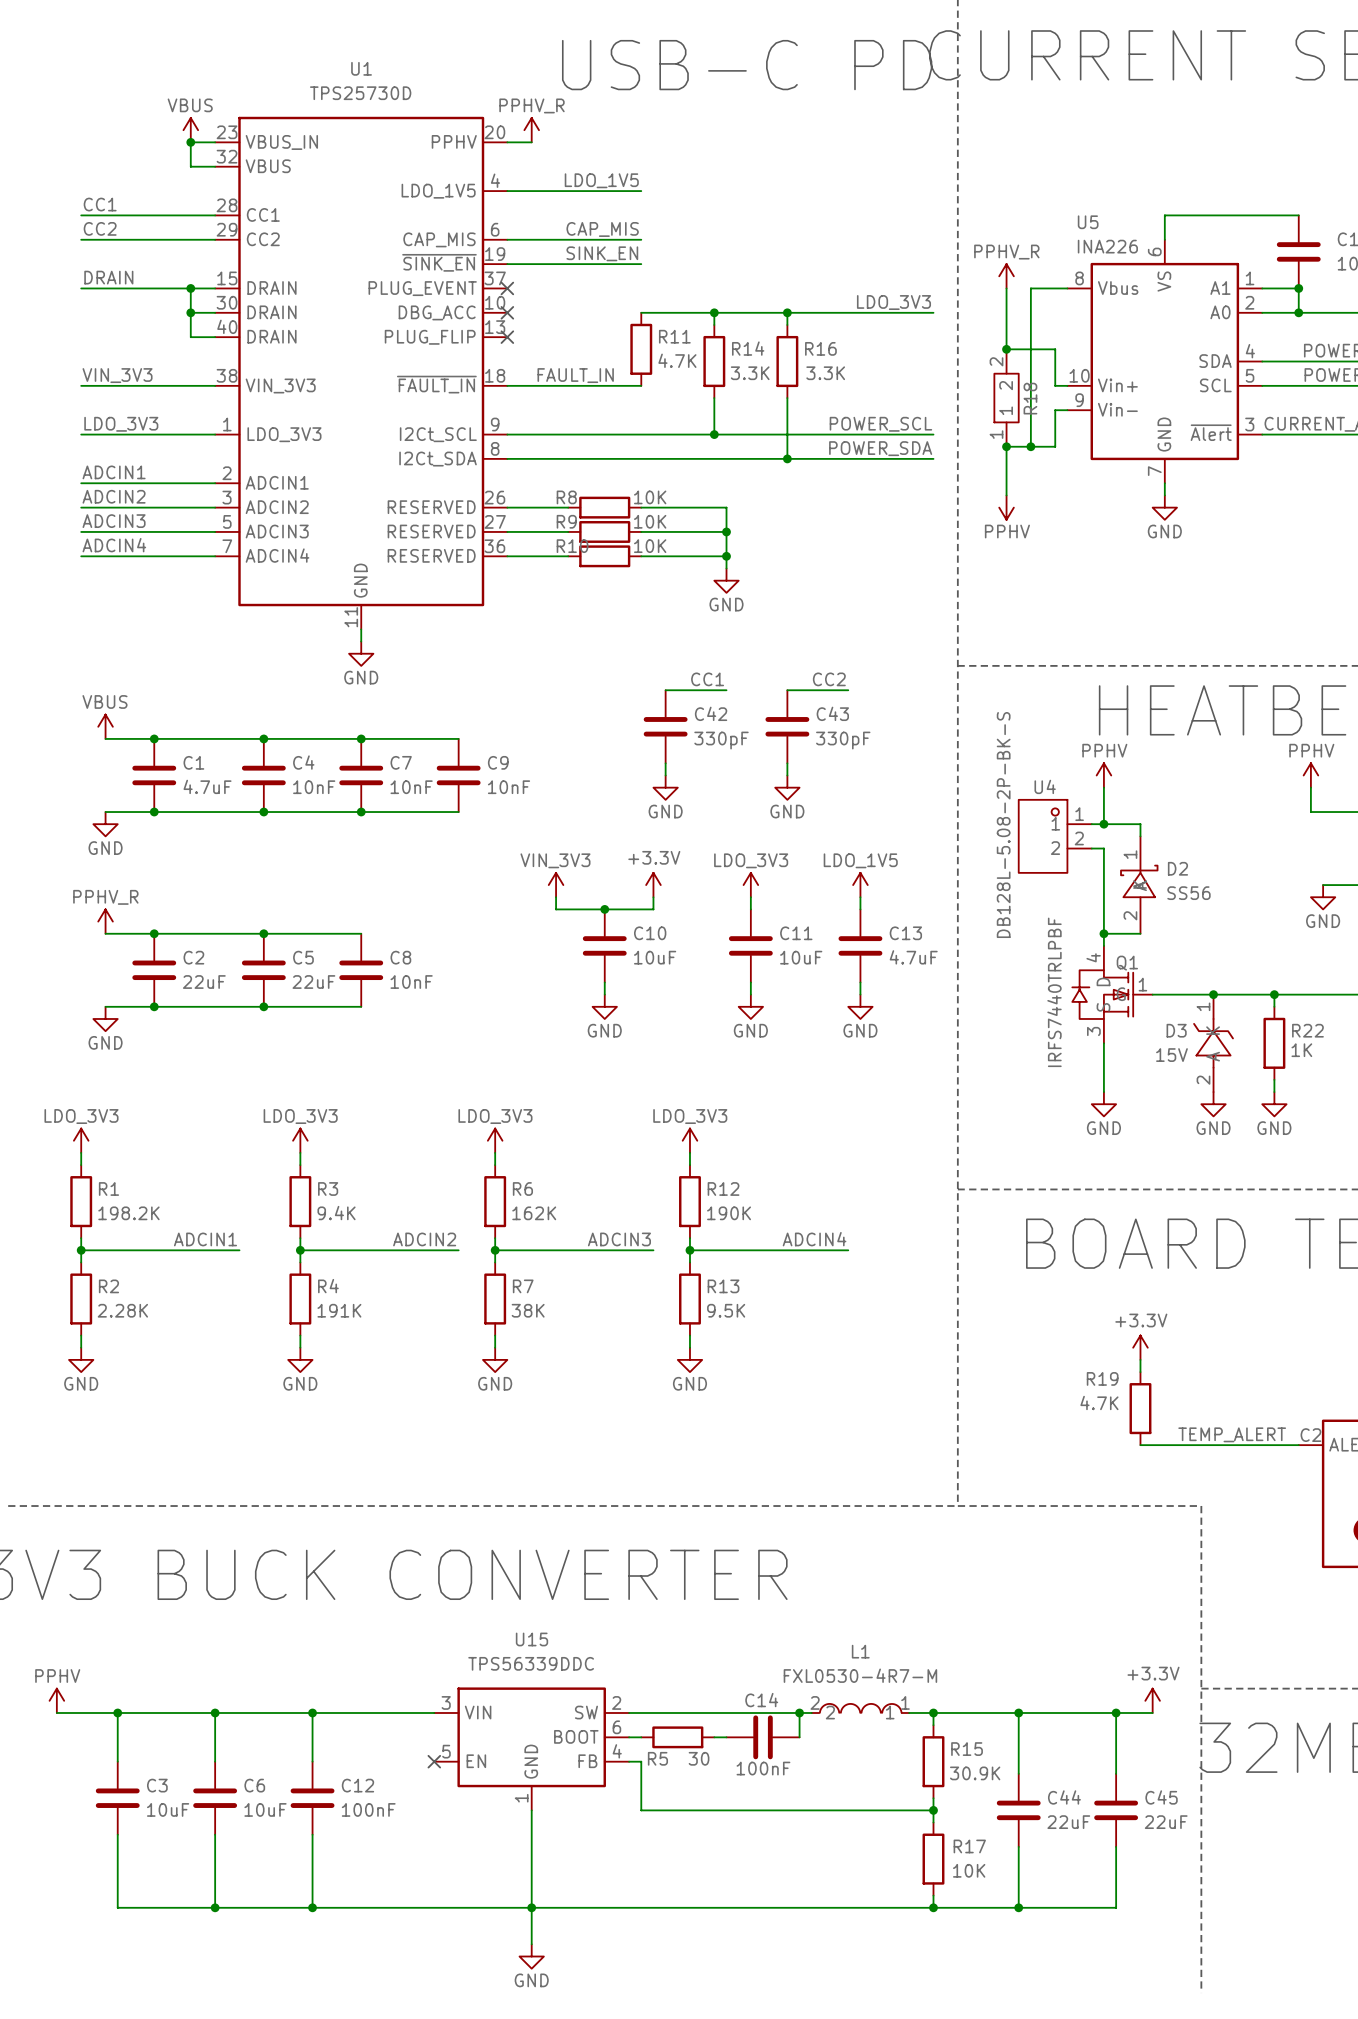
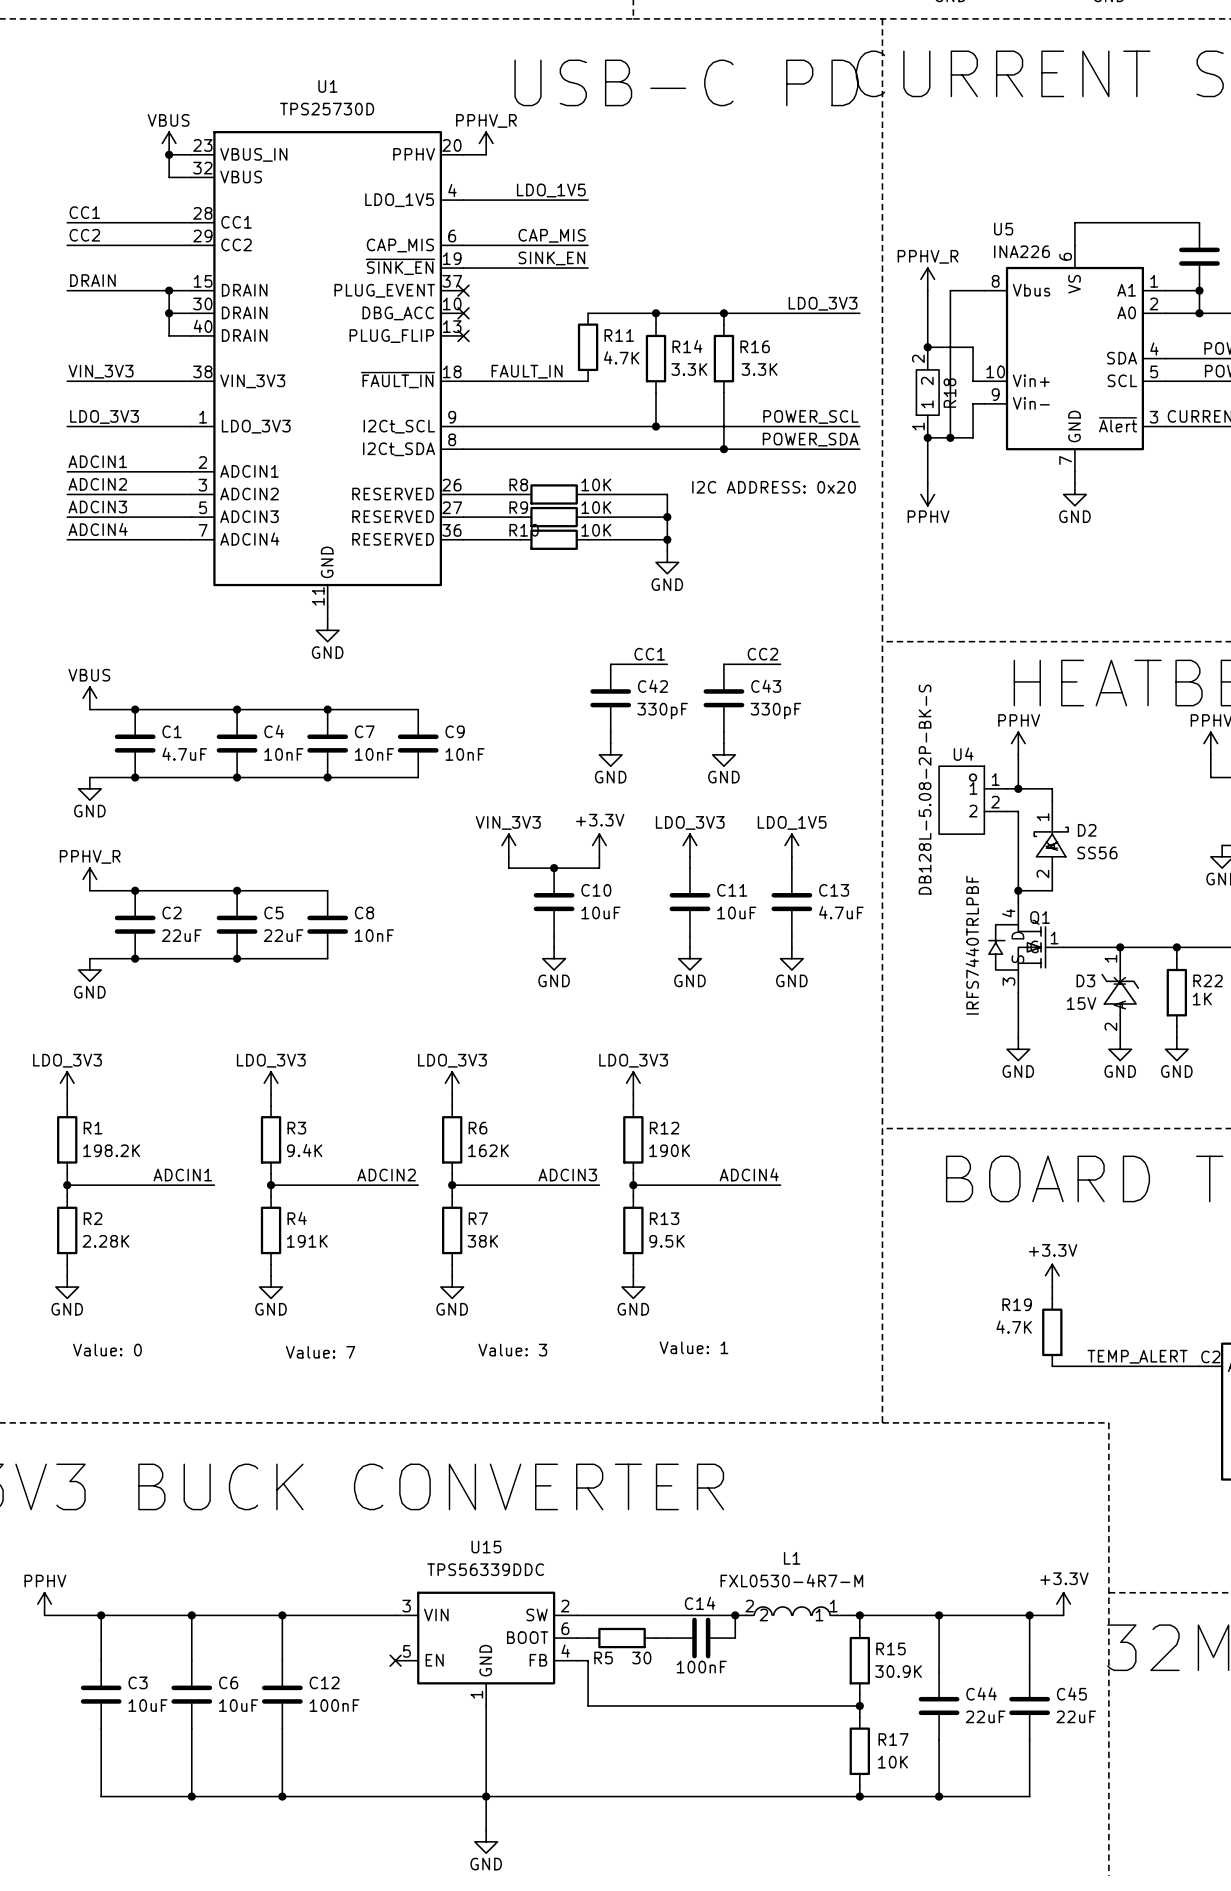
text: none -> I2C ADDRESS: 0x20 (774, 487)
text: none -> Value: 1 (693, 1347)
text: none -> Value: 0 (107, 1350)
text: none -> Value: 3 (512, 1350)
text: none -> Value: 7 (320, 1352)

